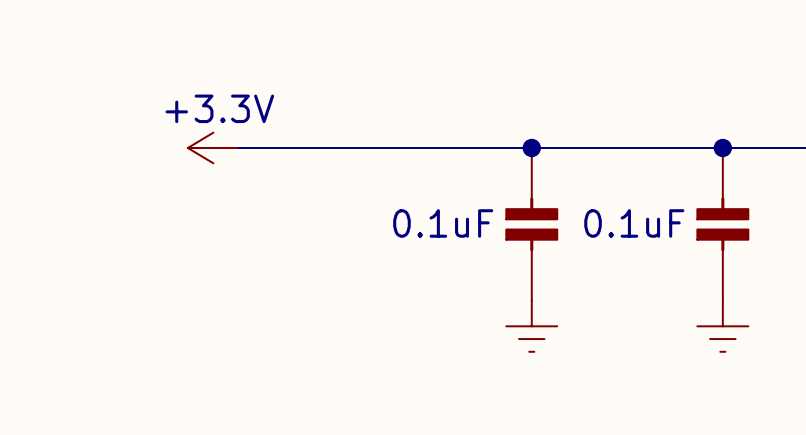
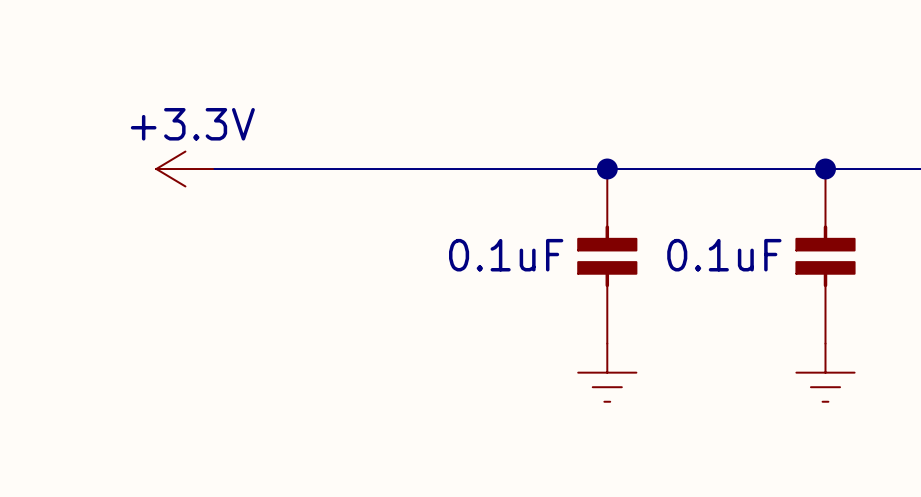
power symbol position: +3.3V (213, 147) -> +3.3V (185, 169)

